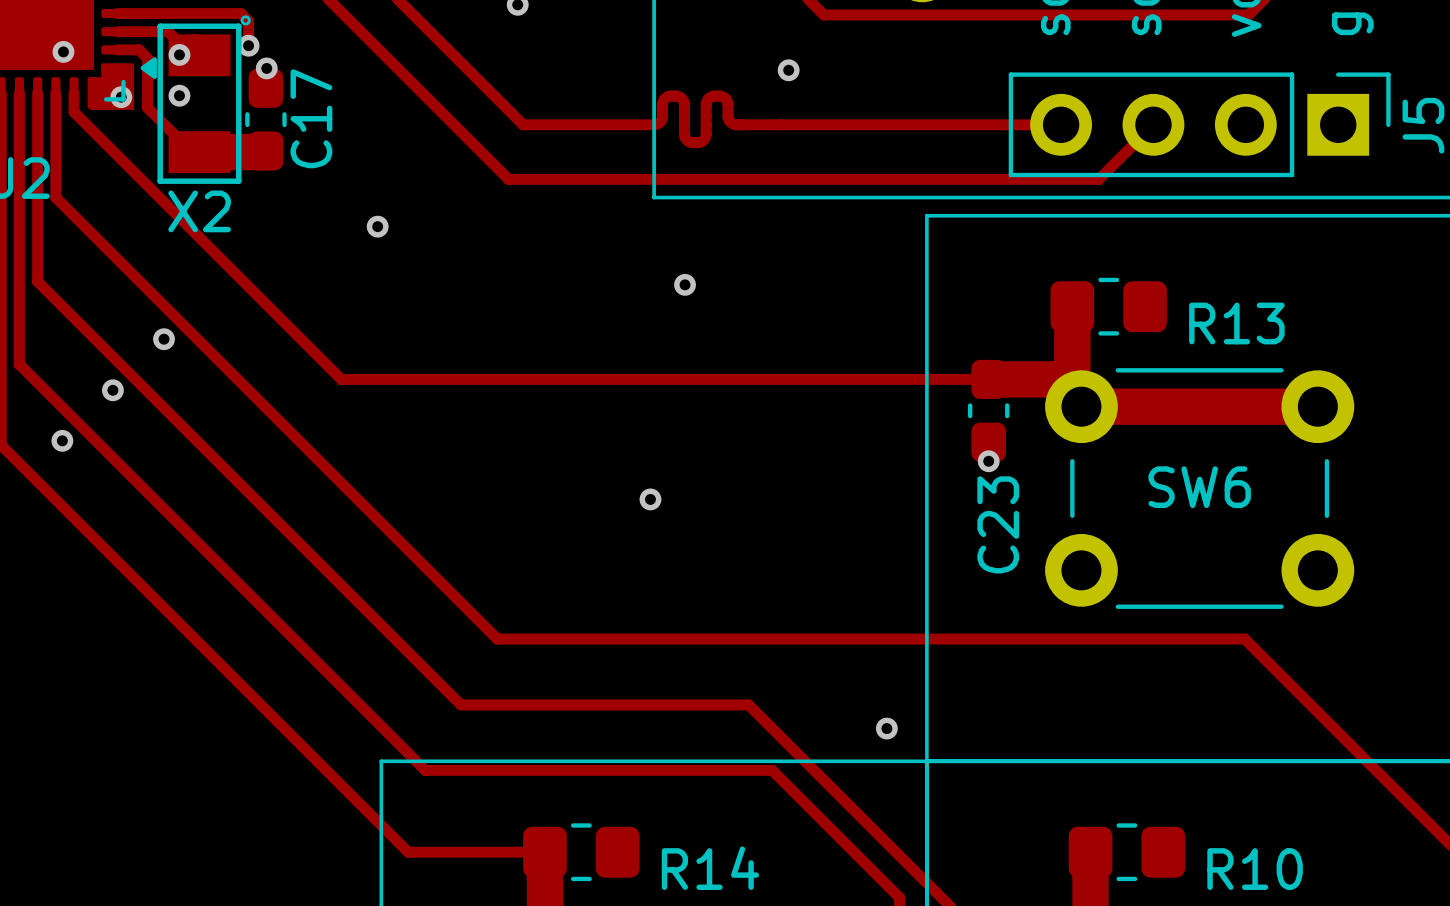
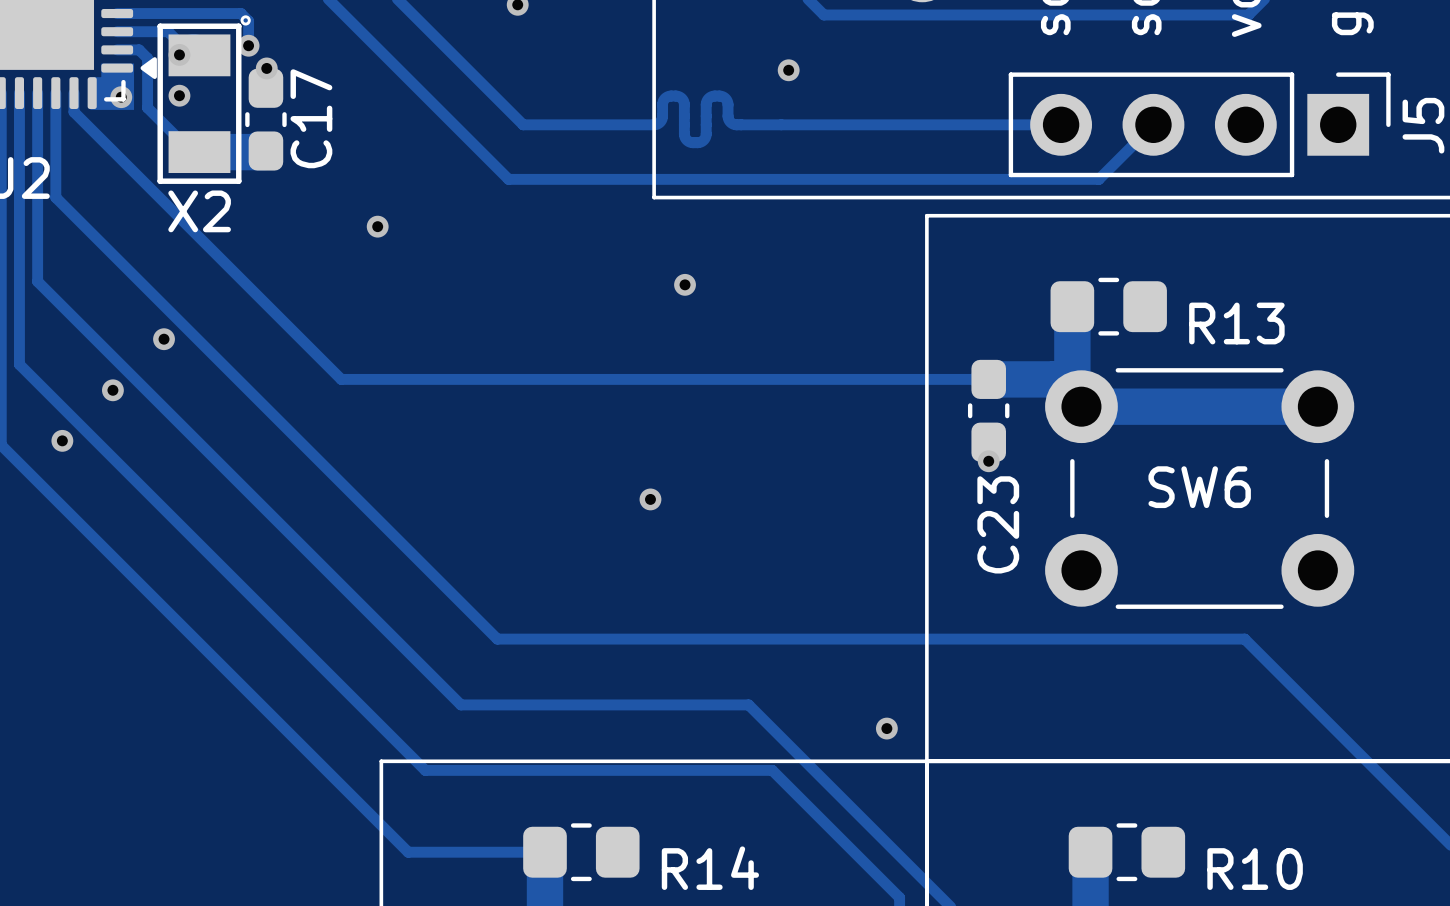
via: (63, 51) -> none

